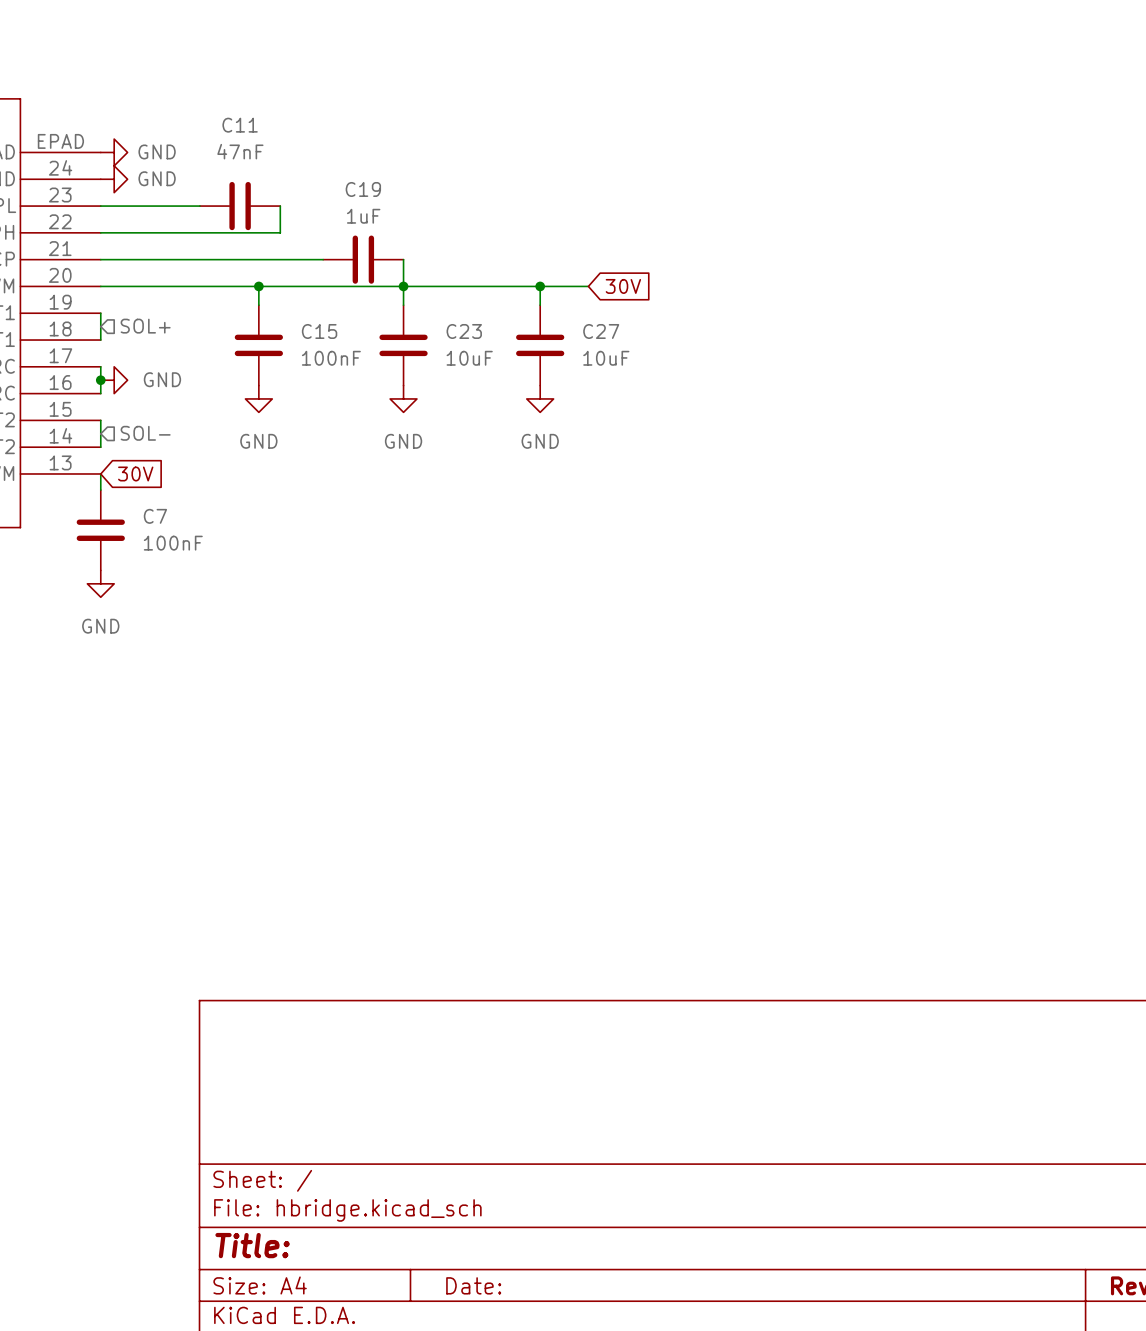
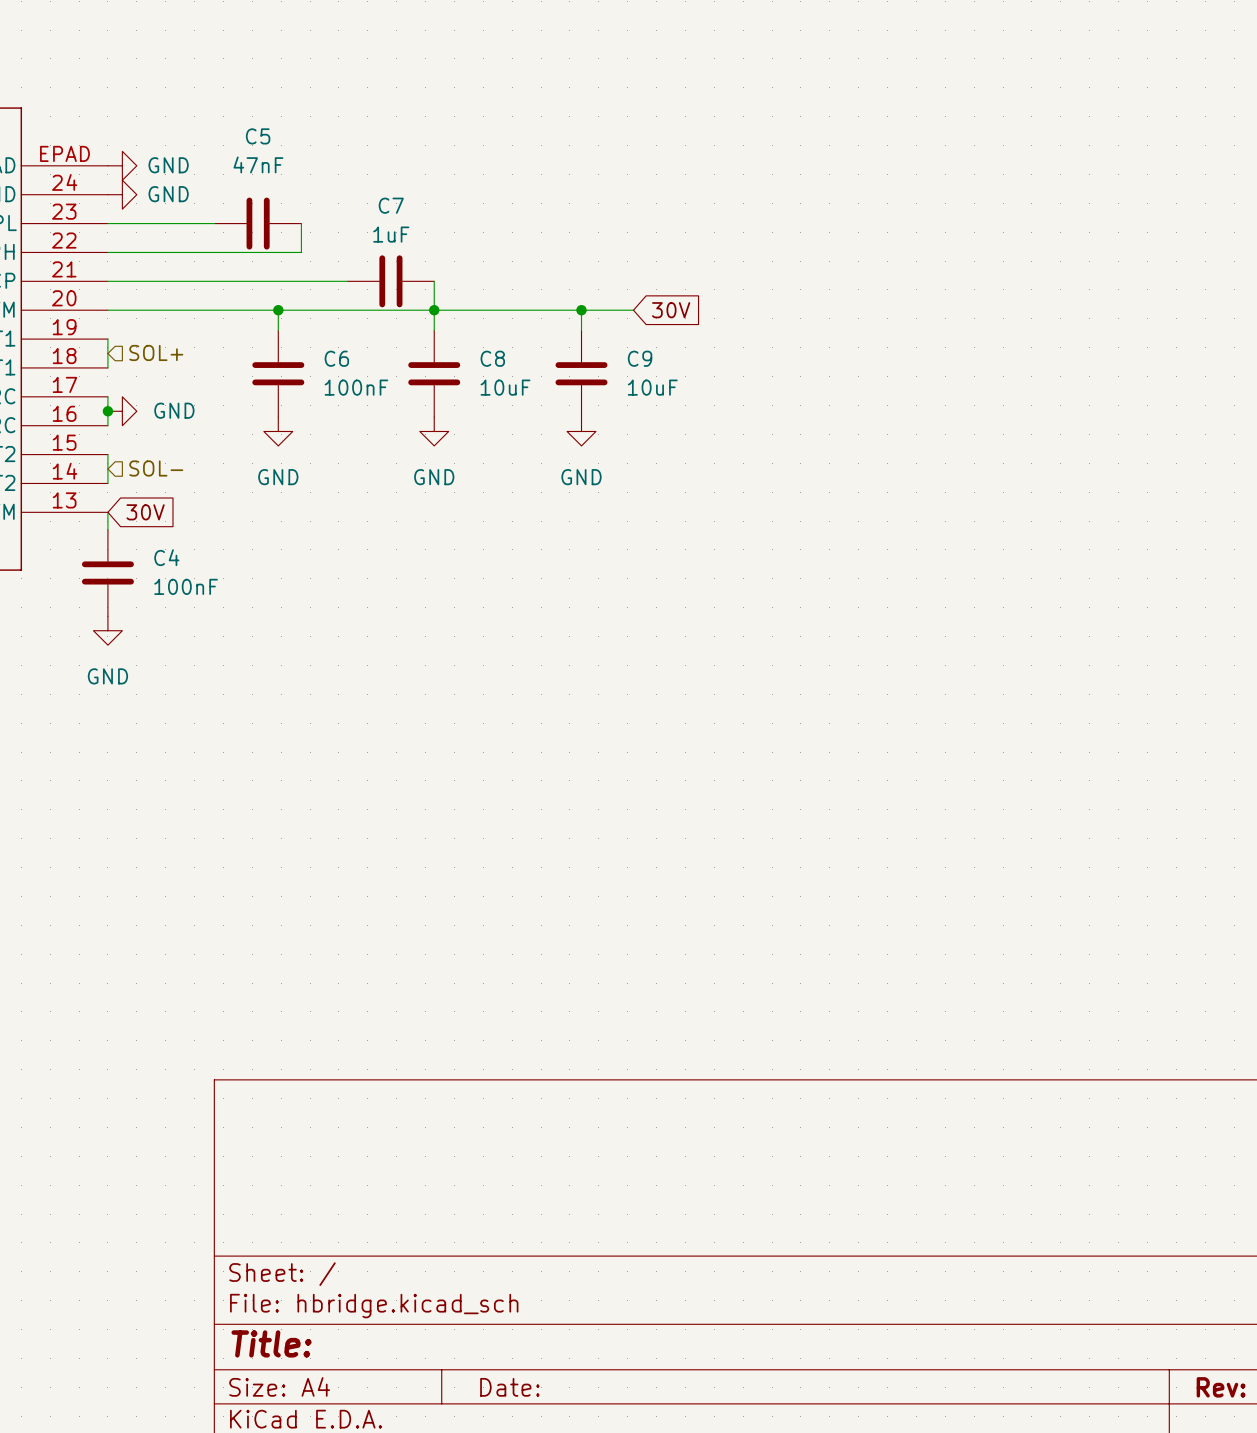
C11 name: C11 (240, 125) -> C5 (258, 136)
C19 name: C19 (363, 189) -> C7 (391, 205)
C15 name: C15 (319, 331) -> C6 (336, 358)
C23 name: C23 (464, 331) -> C8 (492, 358)
C27 name: C27 (601, 331) -> C9 (640, 358)
C7 name: C7 (155, 516) -> C4 (166, 557)

